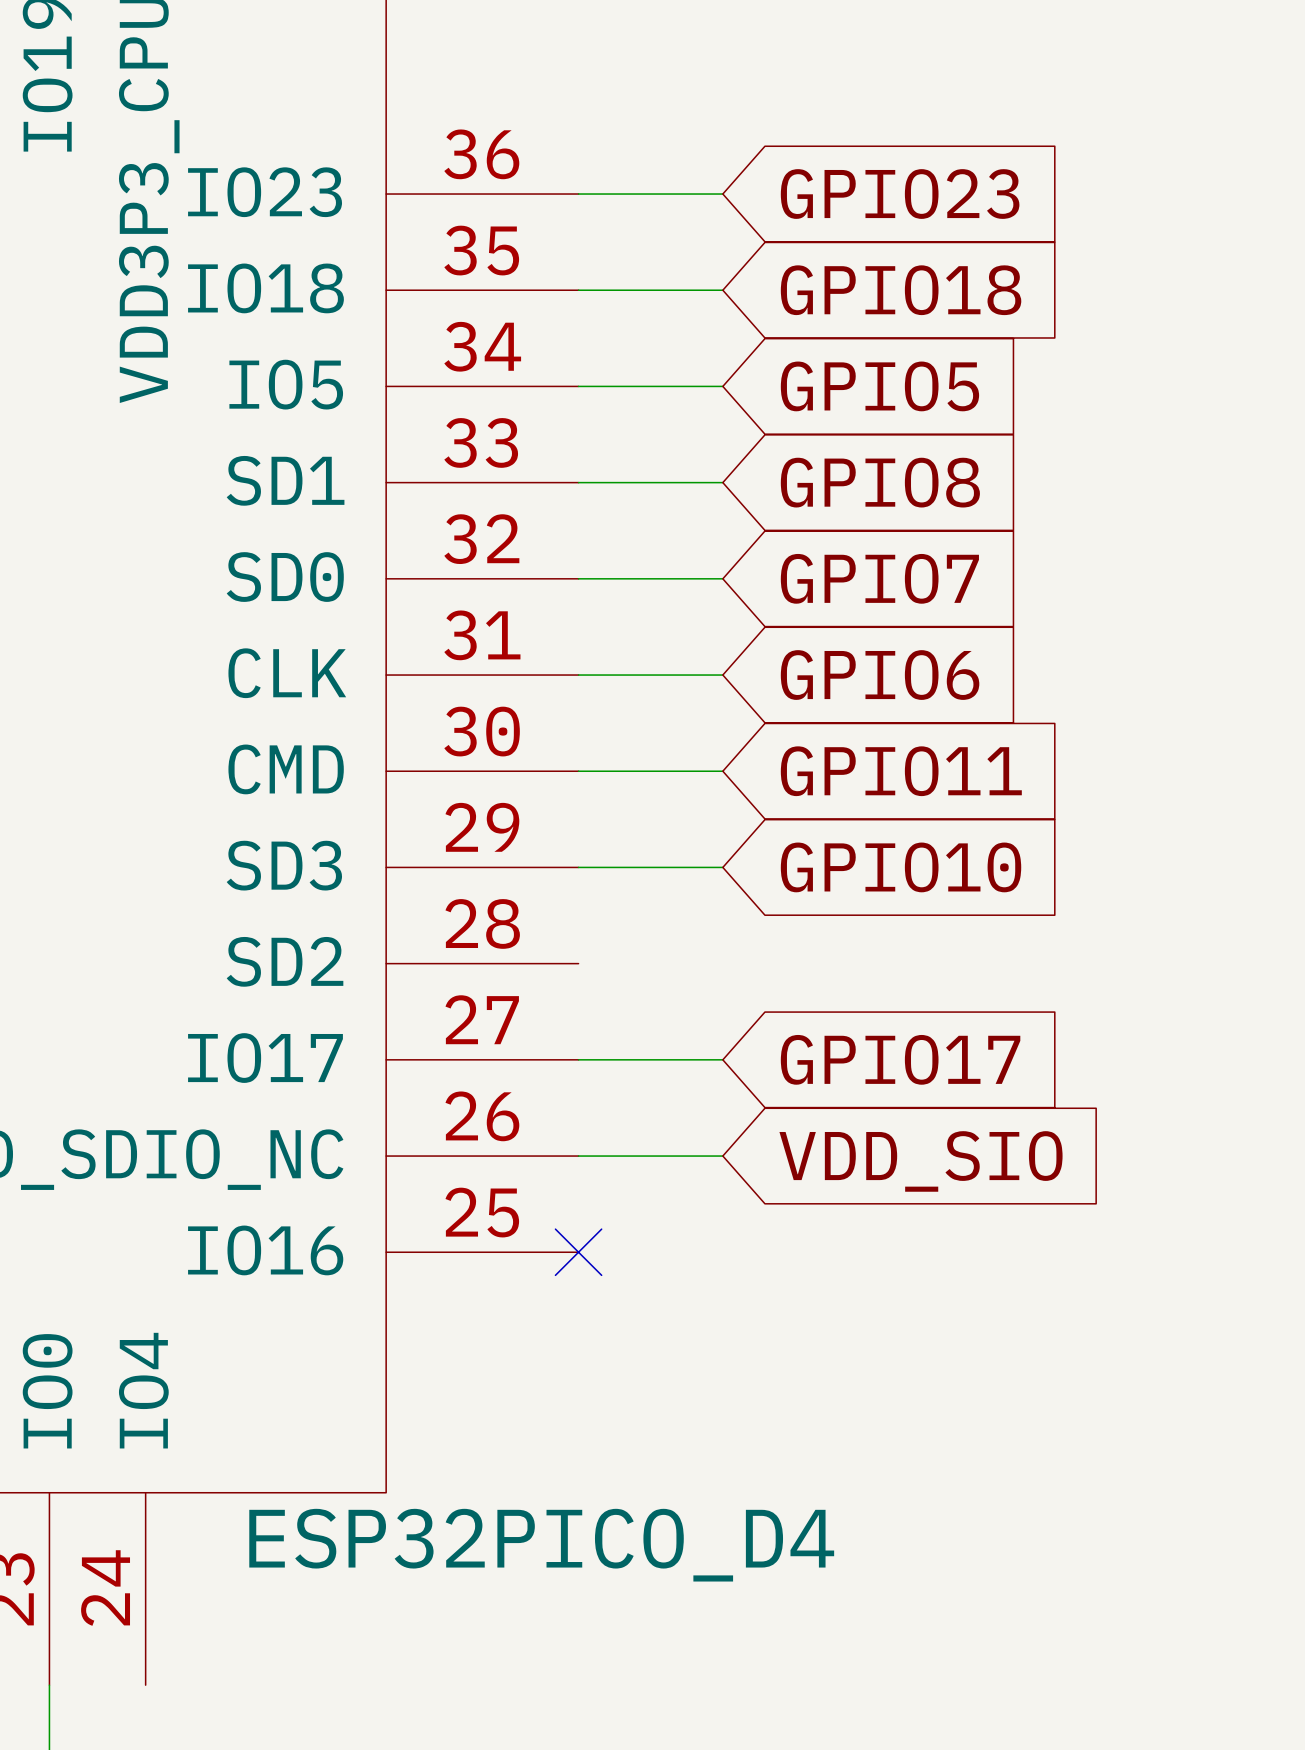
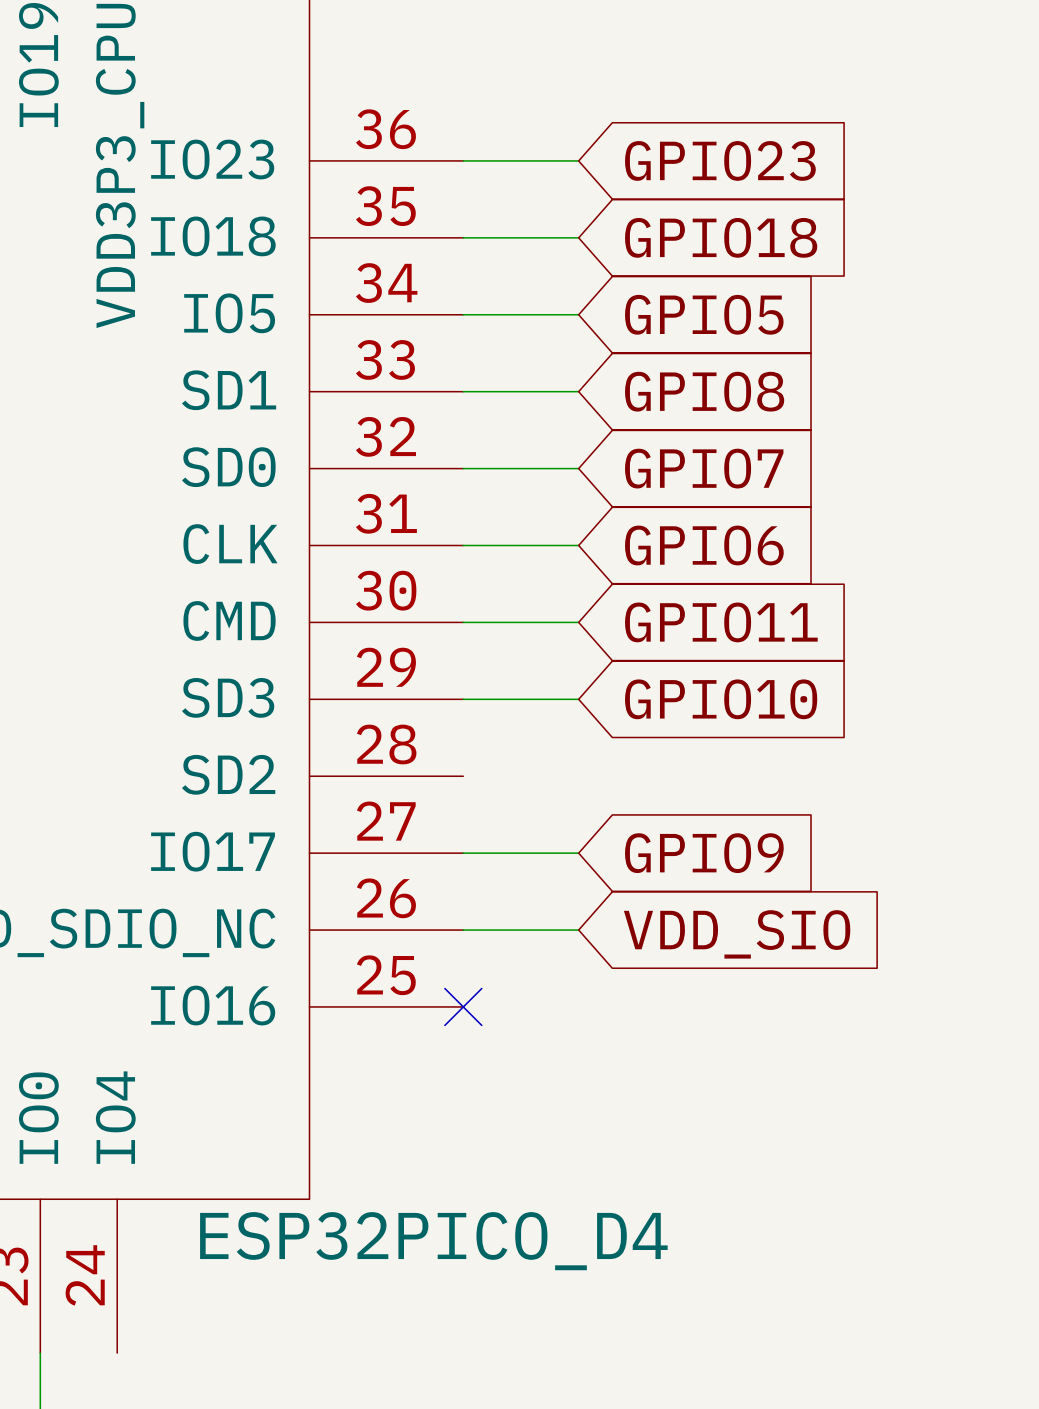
global label: GPIO17 (900, 1059) -> GPIO9 (704, 853)

